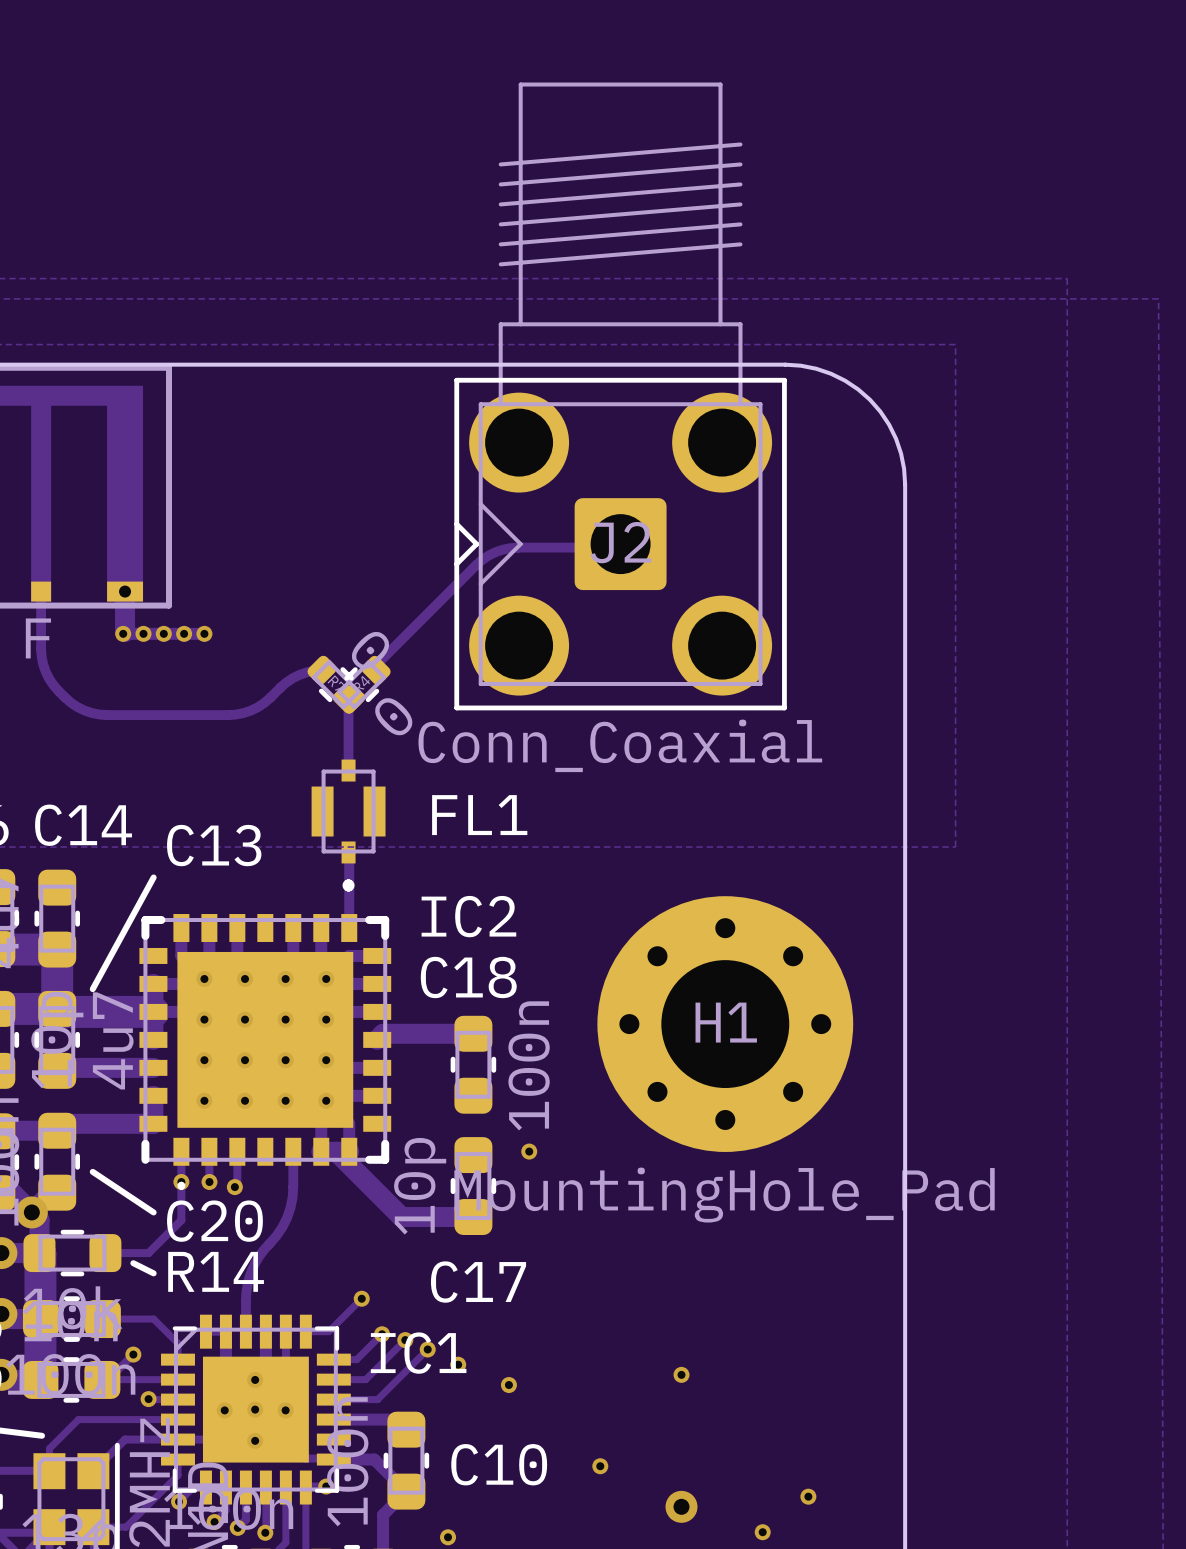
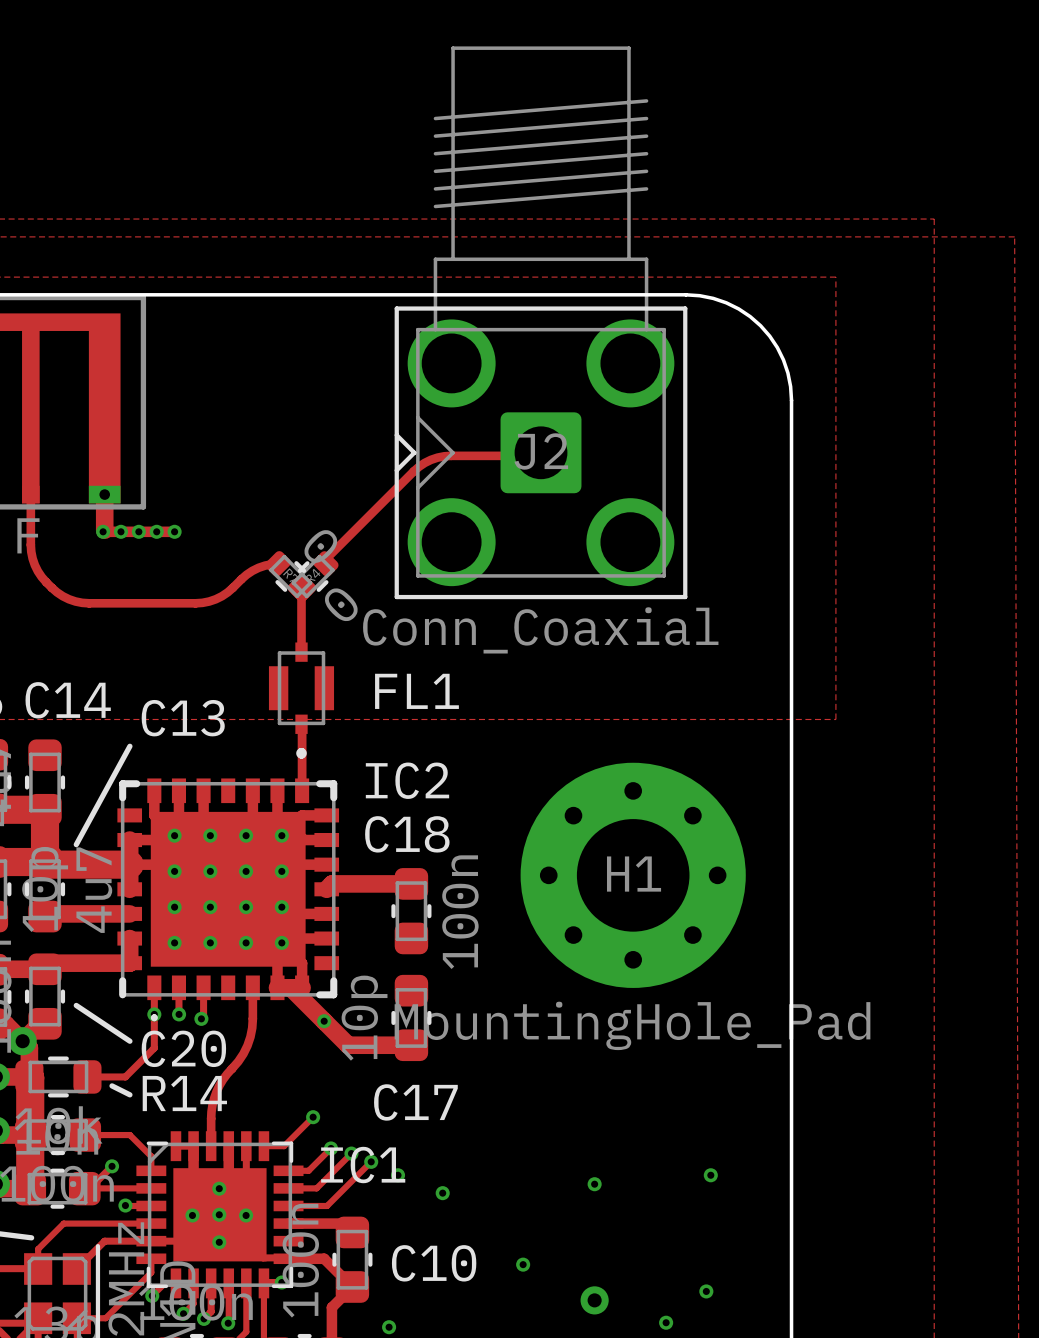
via position: (529, 1151) -> (324, 1021)
via: none -> (710, 1175)

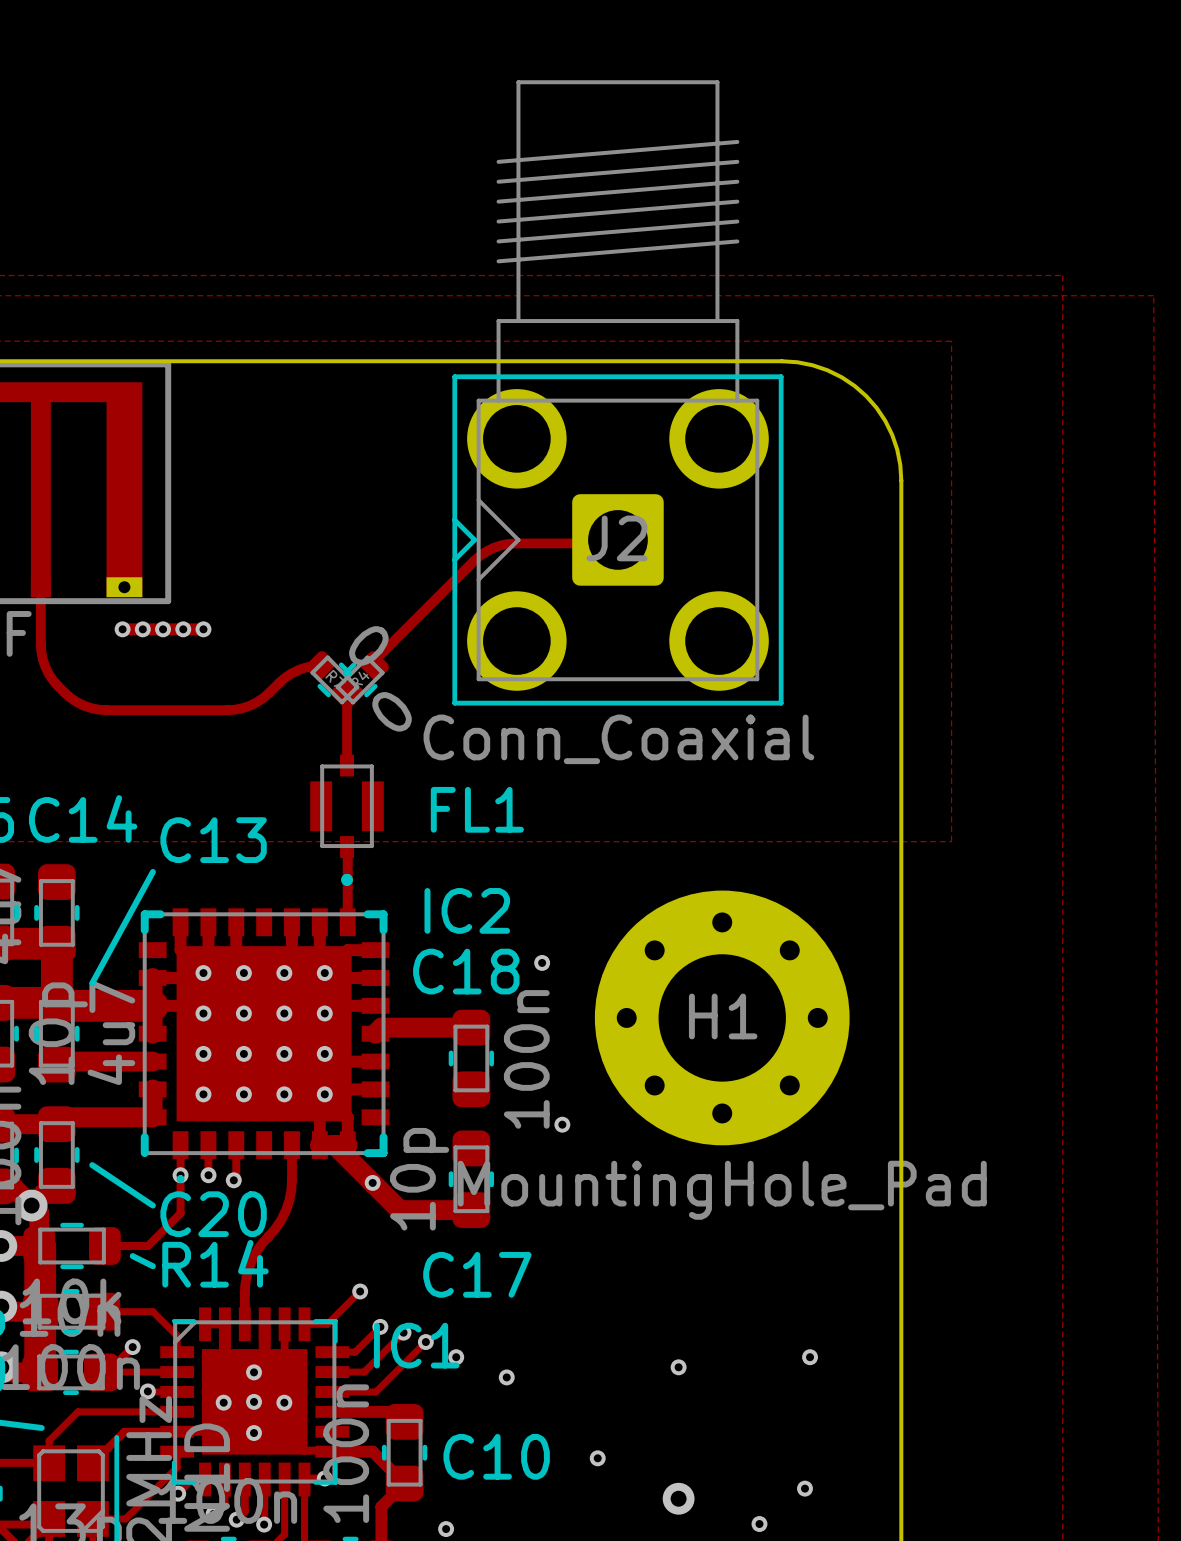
track: (104, 494) (104, 530) -> none
via: none -> (542, 962)
via: none -> (562, 1124)

